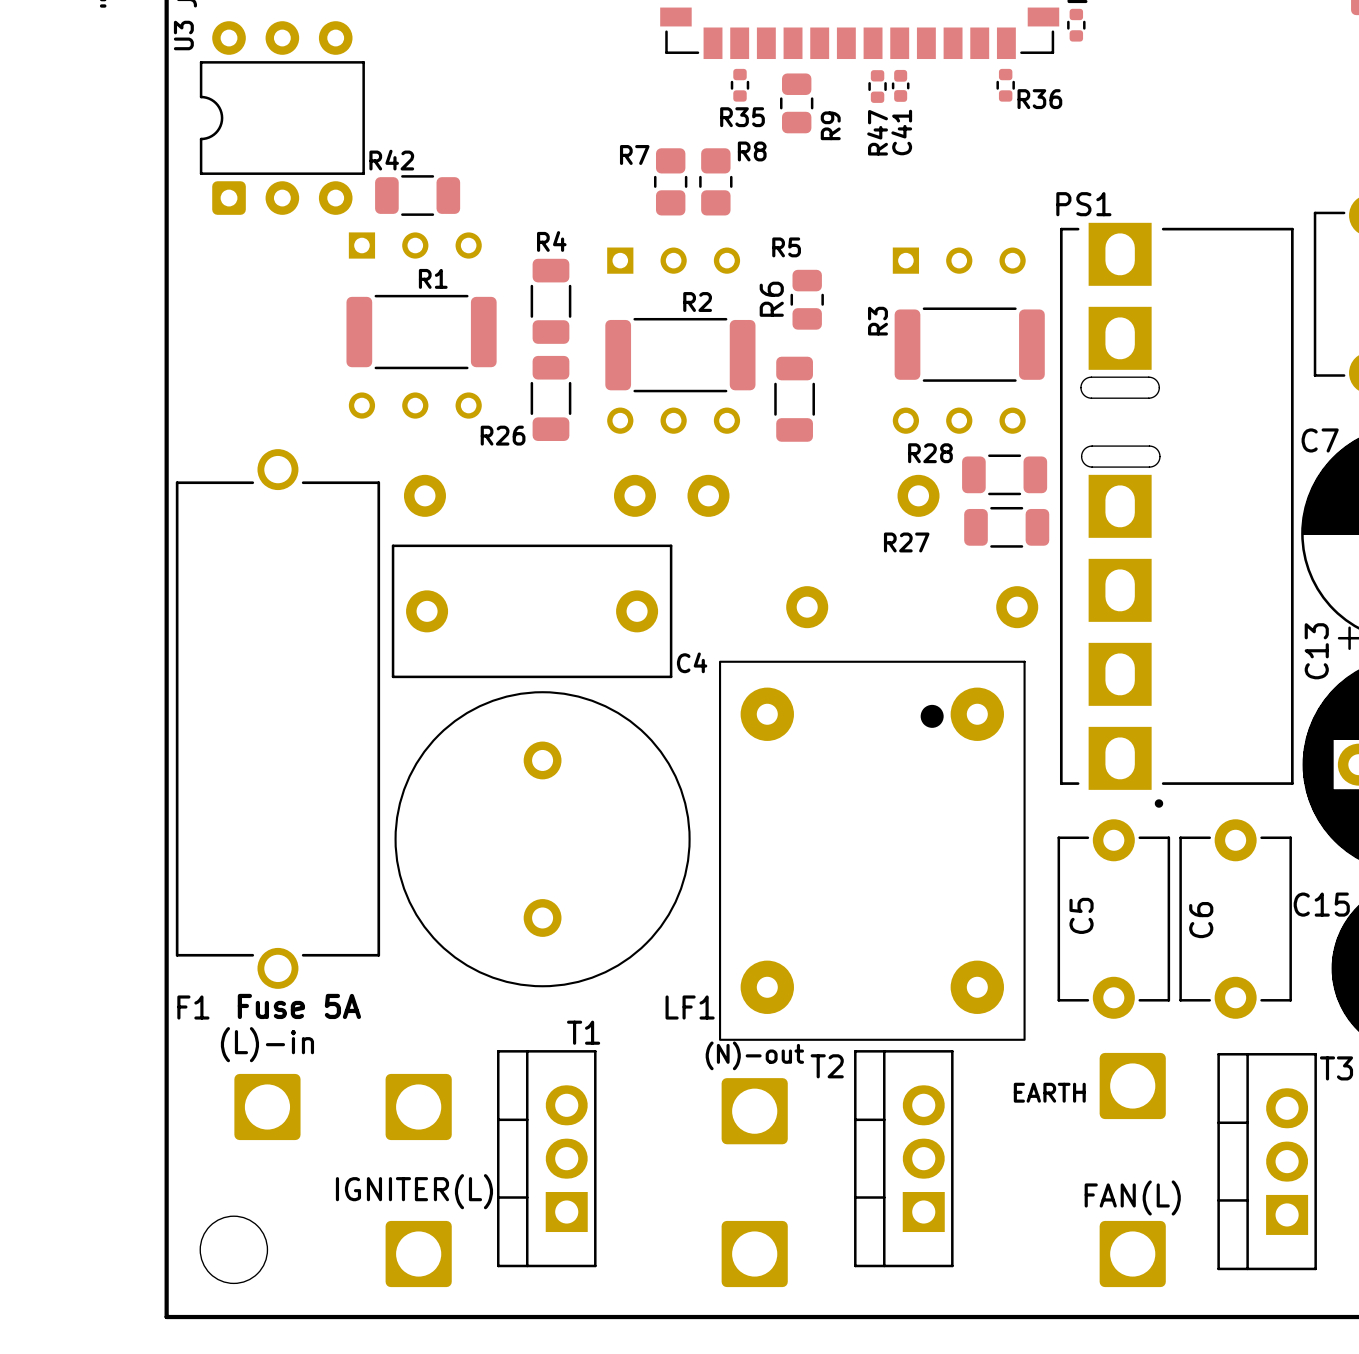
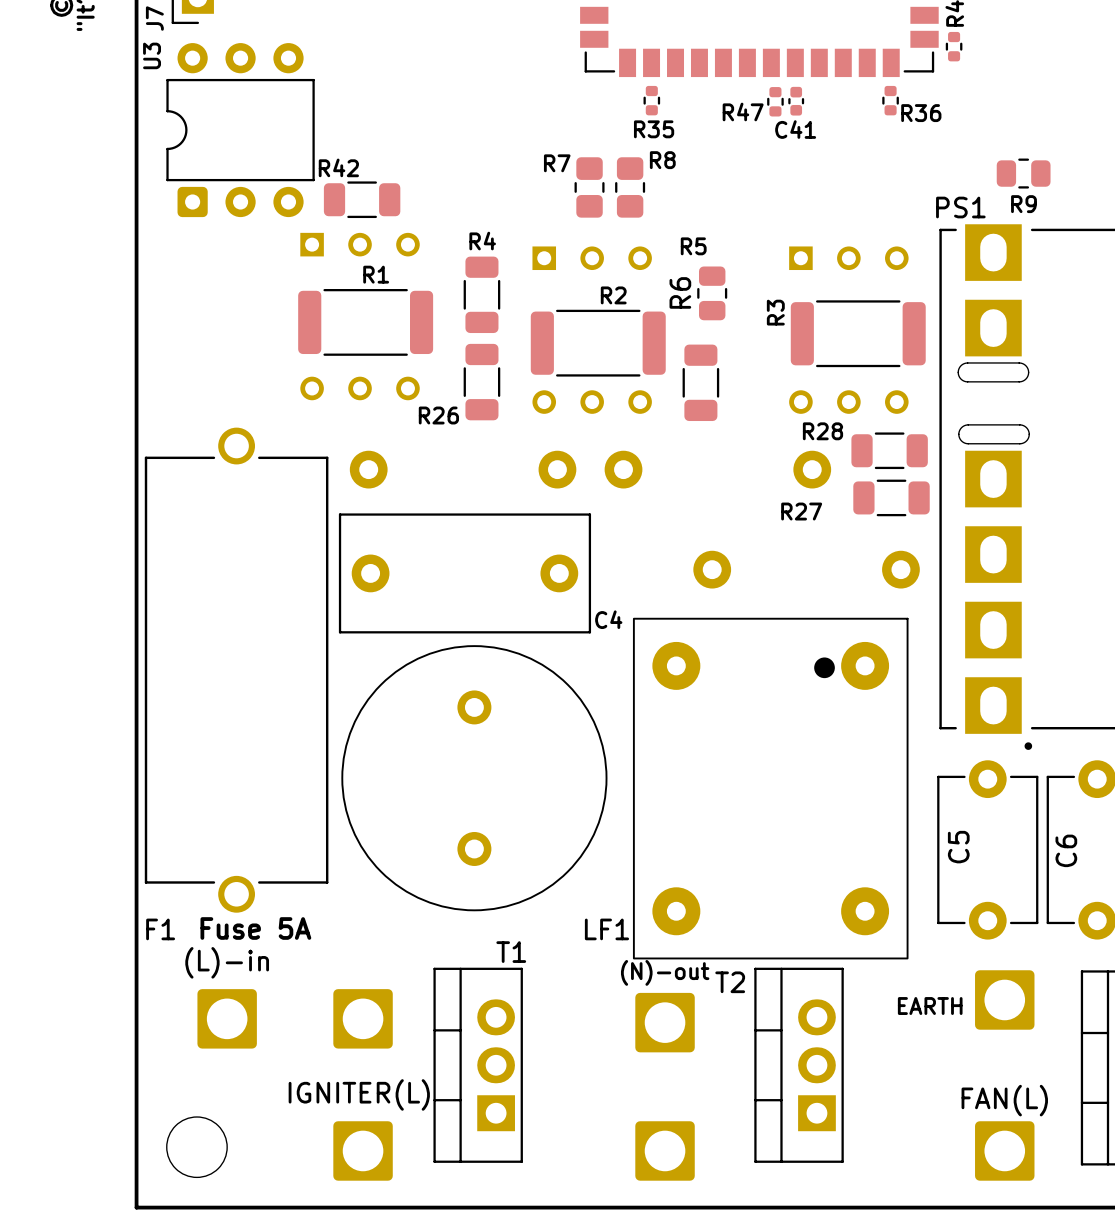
R9 rotation: 0° (796, 103) -> 90° clockwise (1023, 173)
R9 position: (796, 103) -> (1023, 173)
R47 name rotation: 0° (877, 132) -> 90° clockwise (743, 111)
C41 name rotation: 0° (901, 132) -> 90° clockwise (795, 129)

